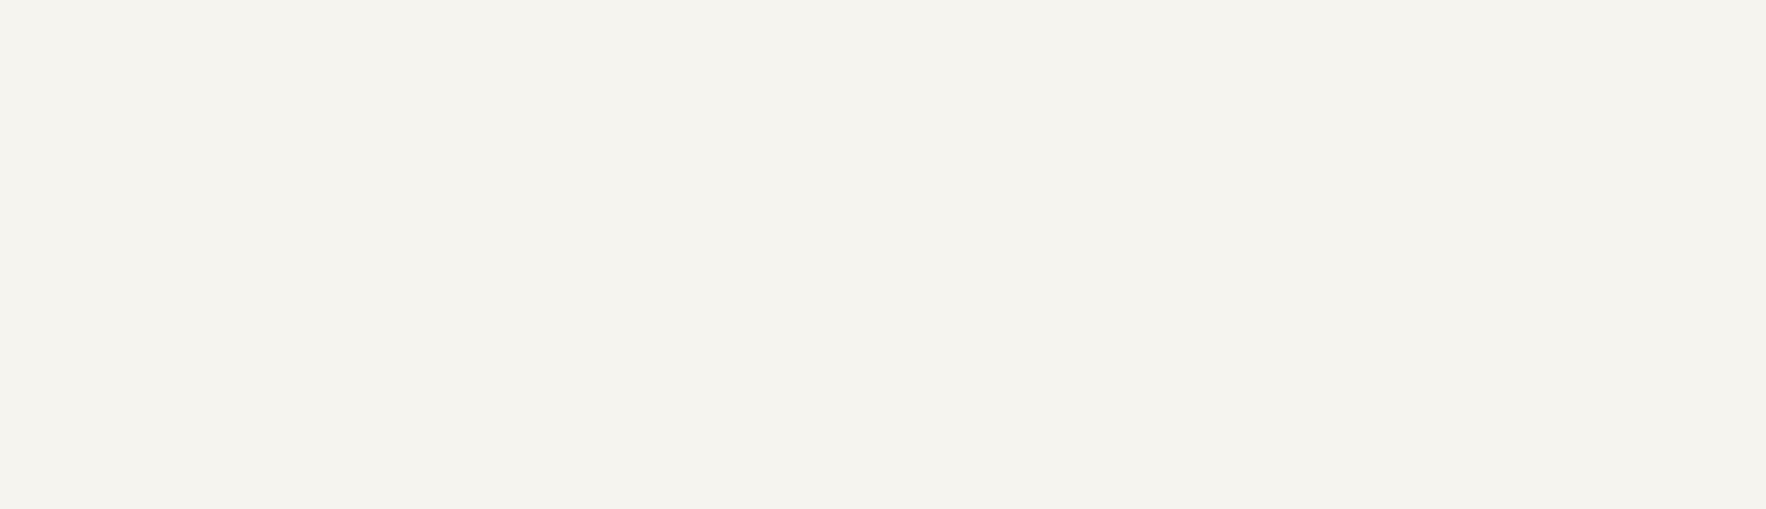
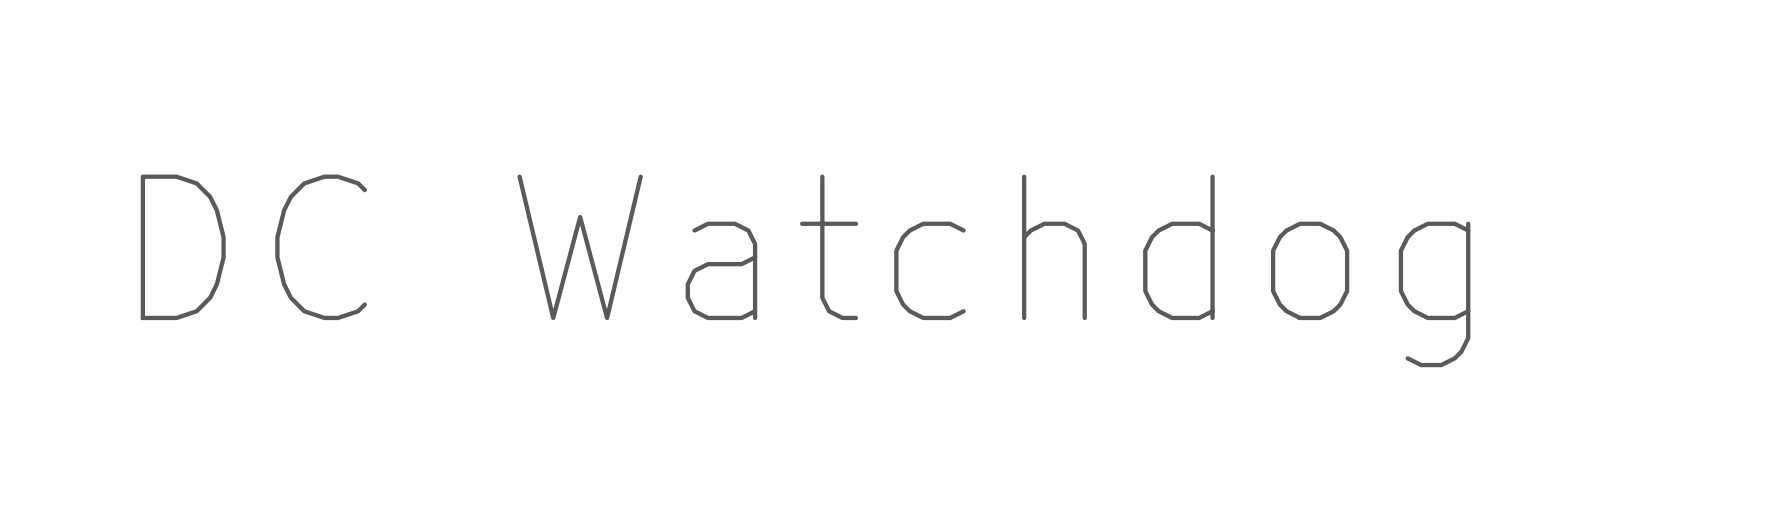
text: none -> DC Watchdog (805, 270)

